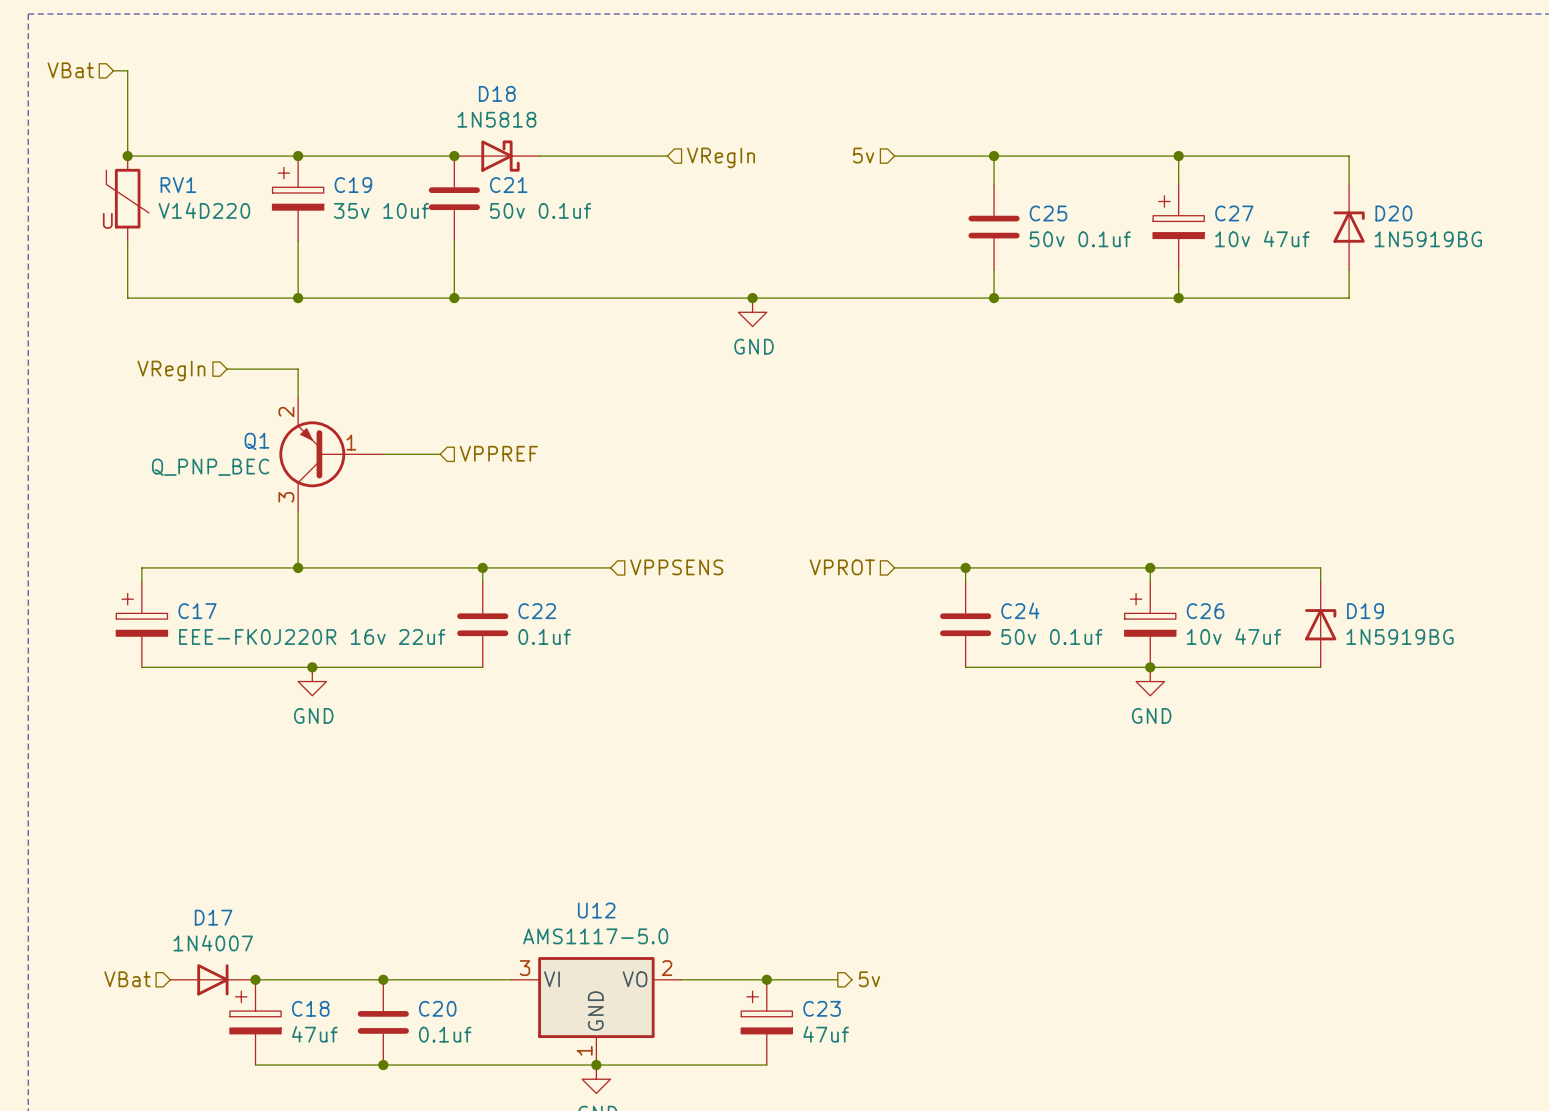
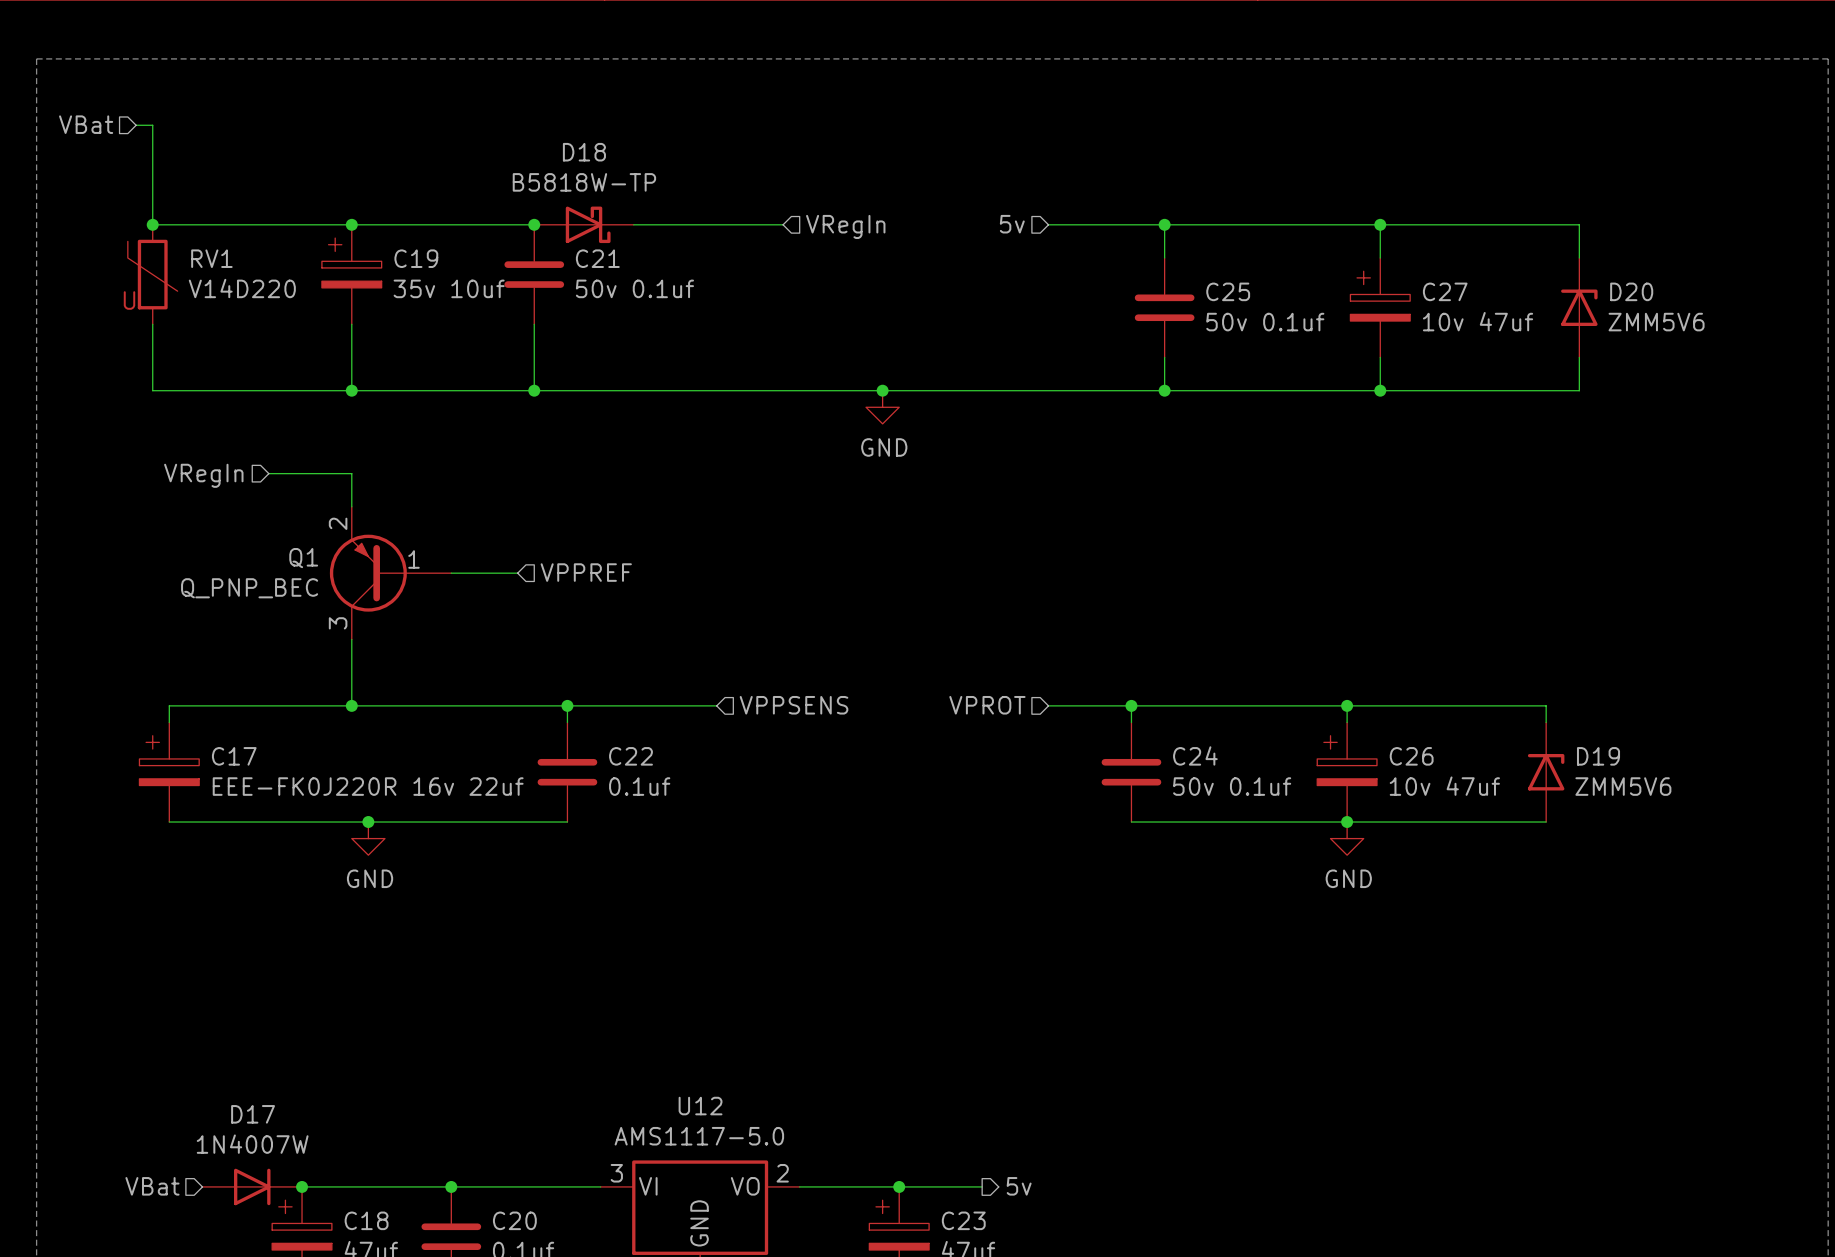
D18 value: 1N5818 (496, 119) -> B5818W-TP (584, 182)
D20 value: 1N5919BG (1428, 239) -> ZMM5V6 (1656, 322)
D19 value: 1N5919BG (1399, 636) -> ZMM5V6 (1623, 786)
D17 value: 1N4007 (213, 943) -> 1N4007W (252, 1144)

